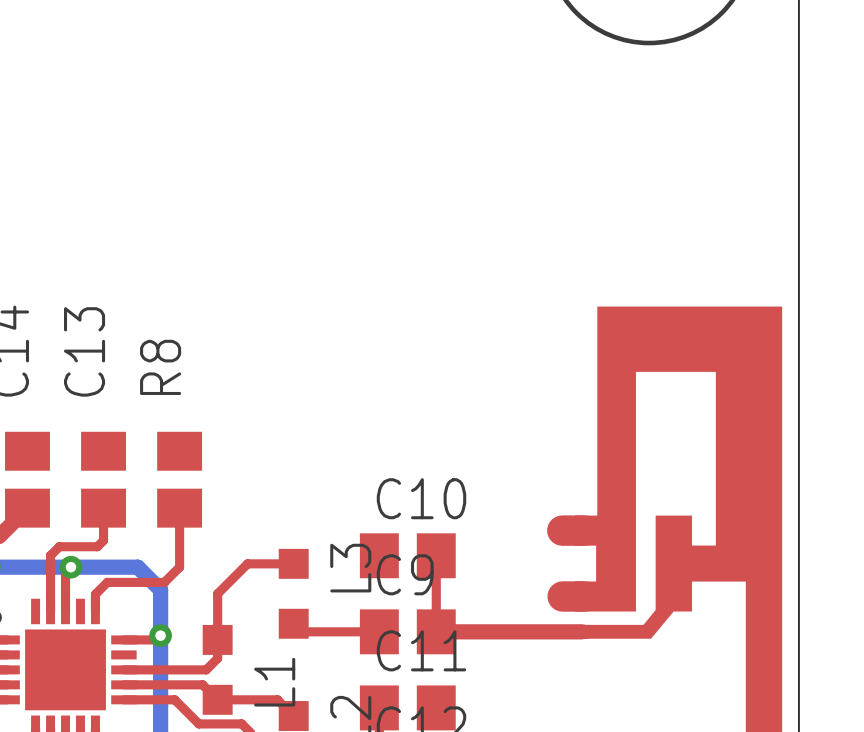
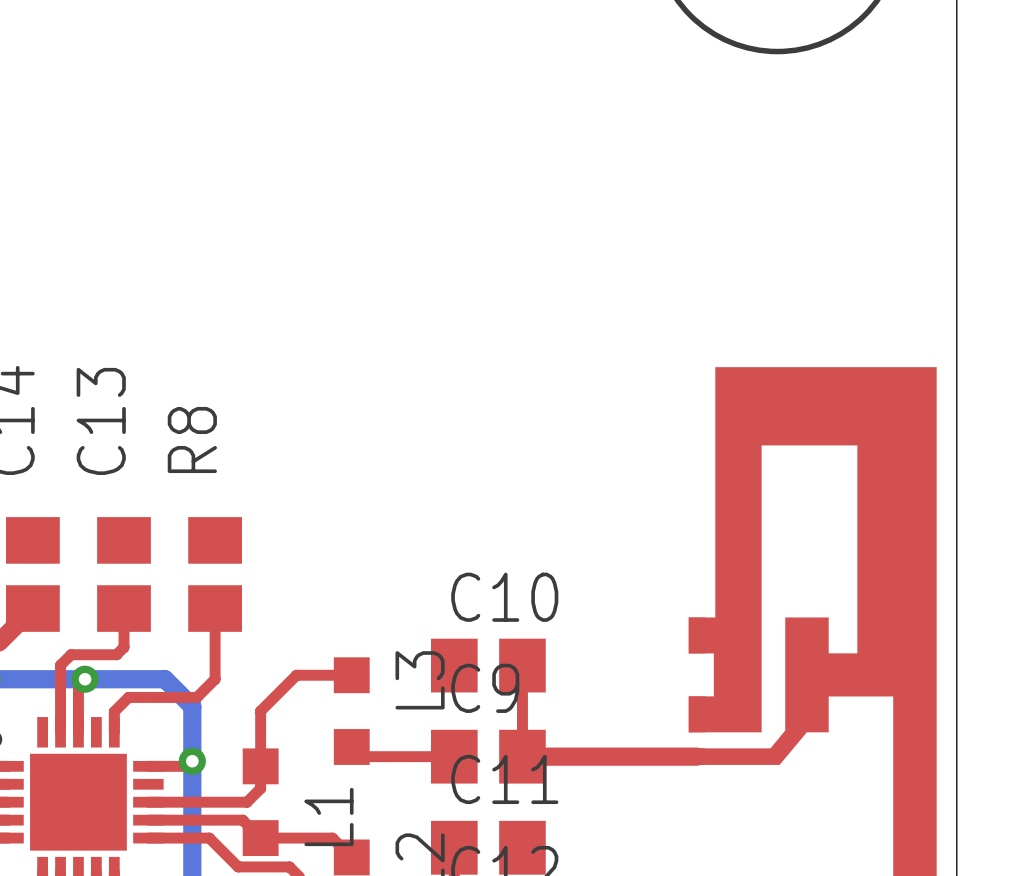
top track: (562, 530) (582, 530) -> none
top track: (562, 596) (582, 596) -> none

